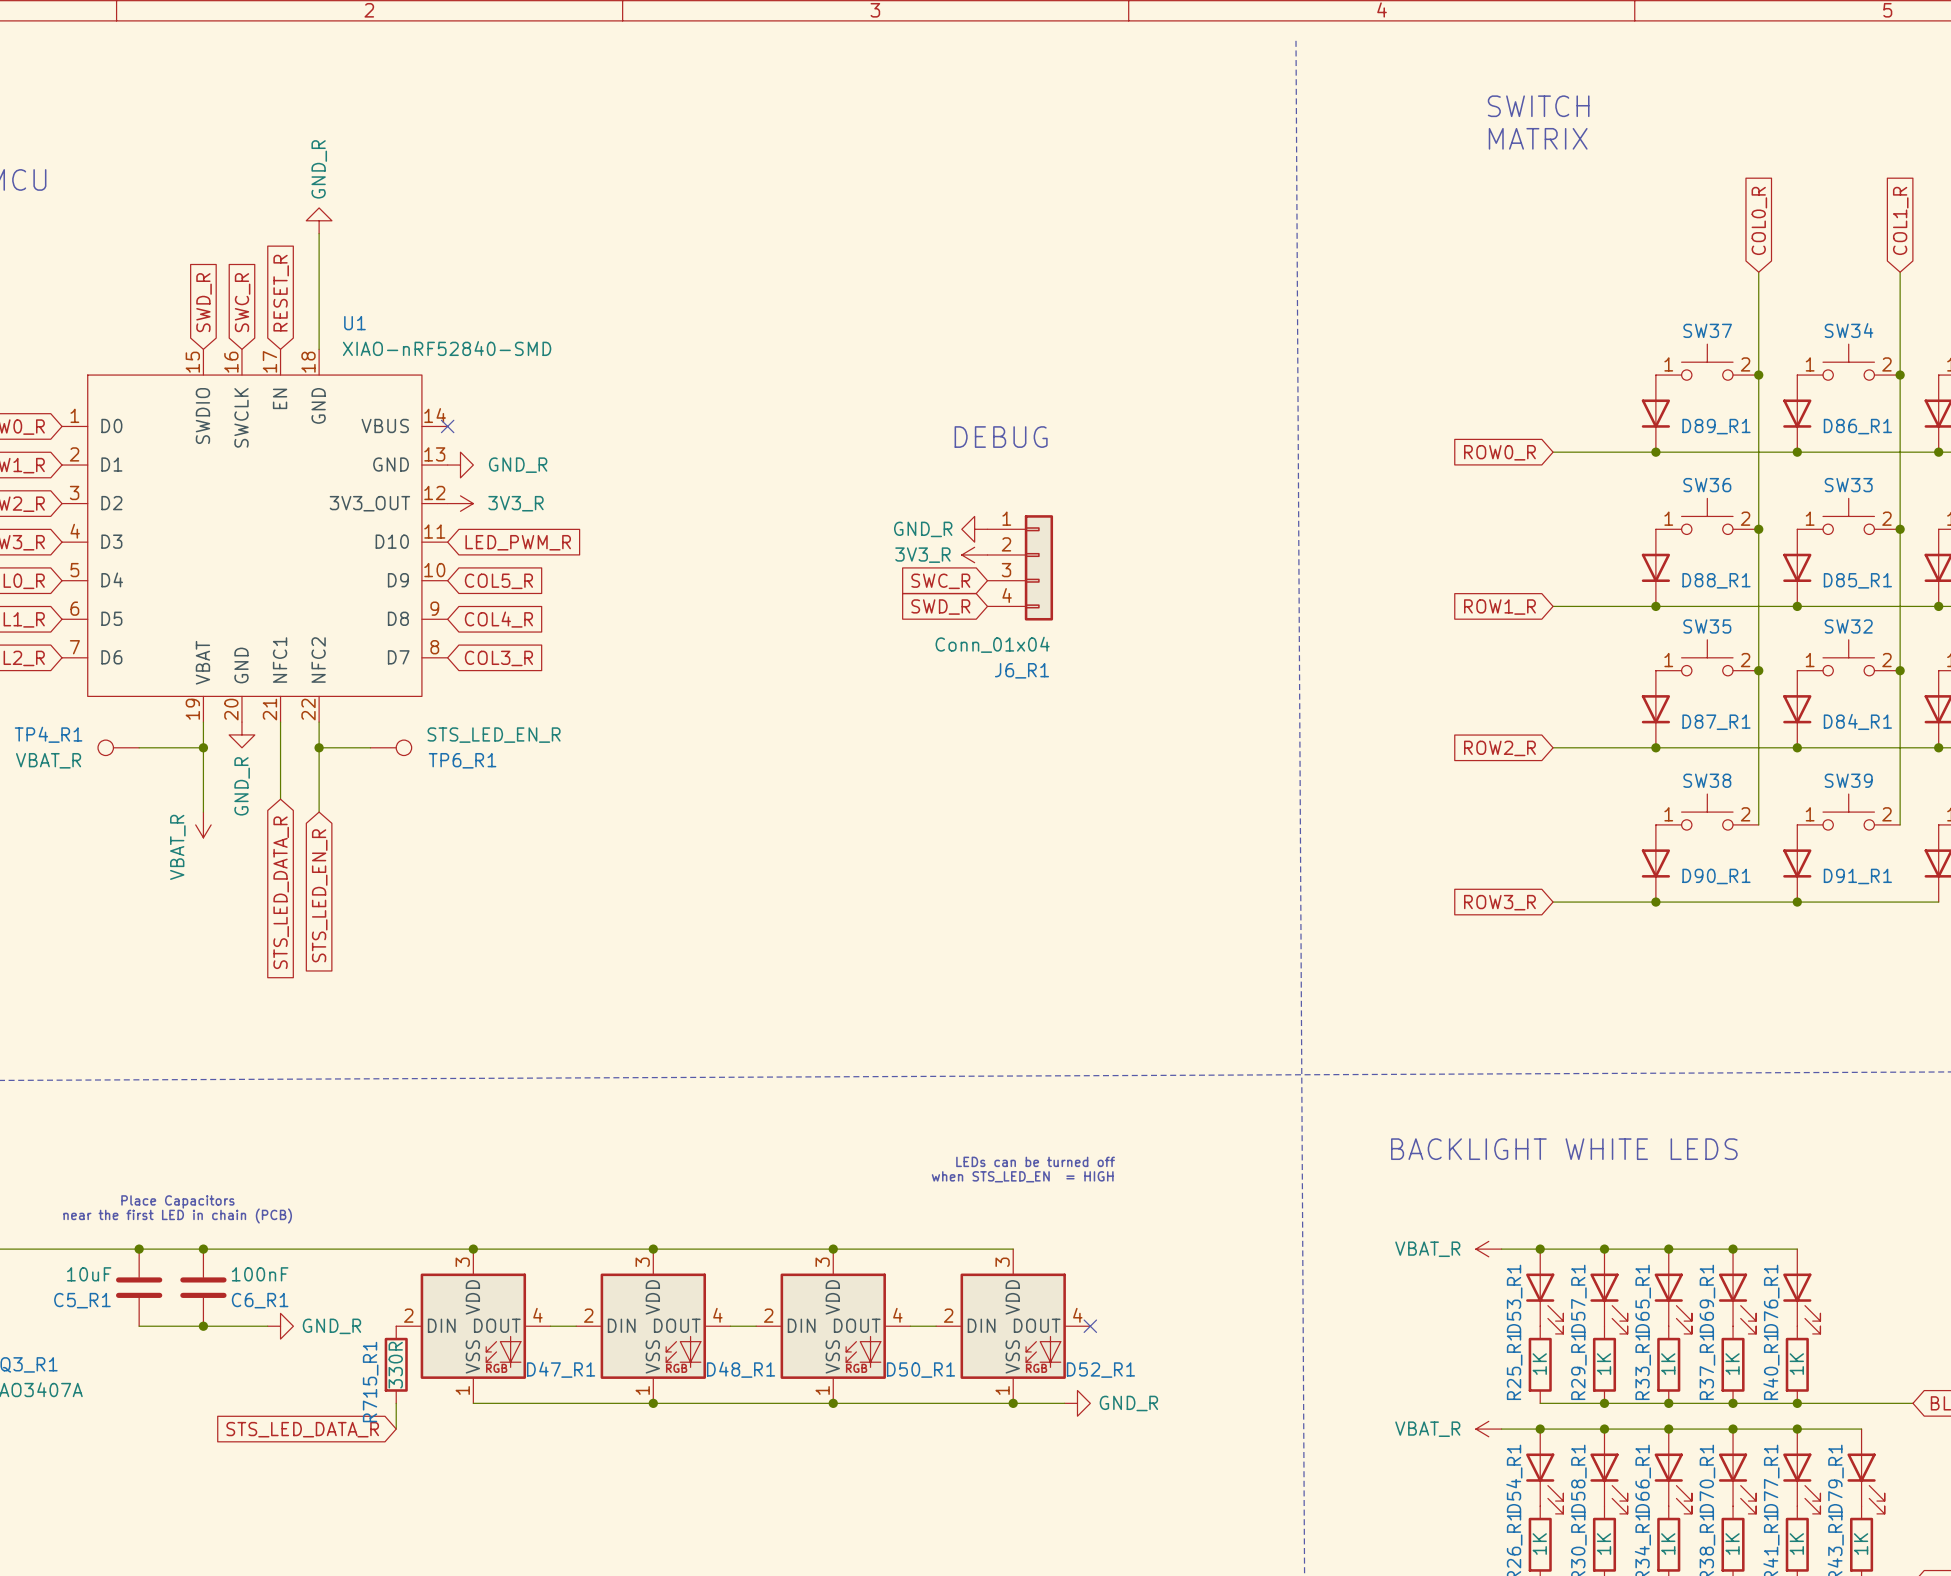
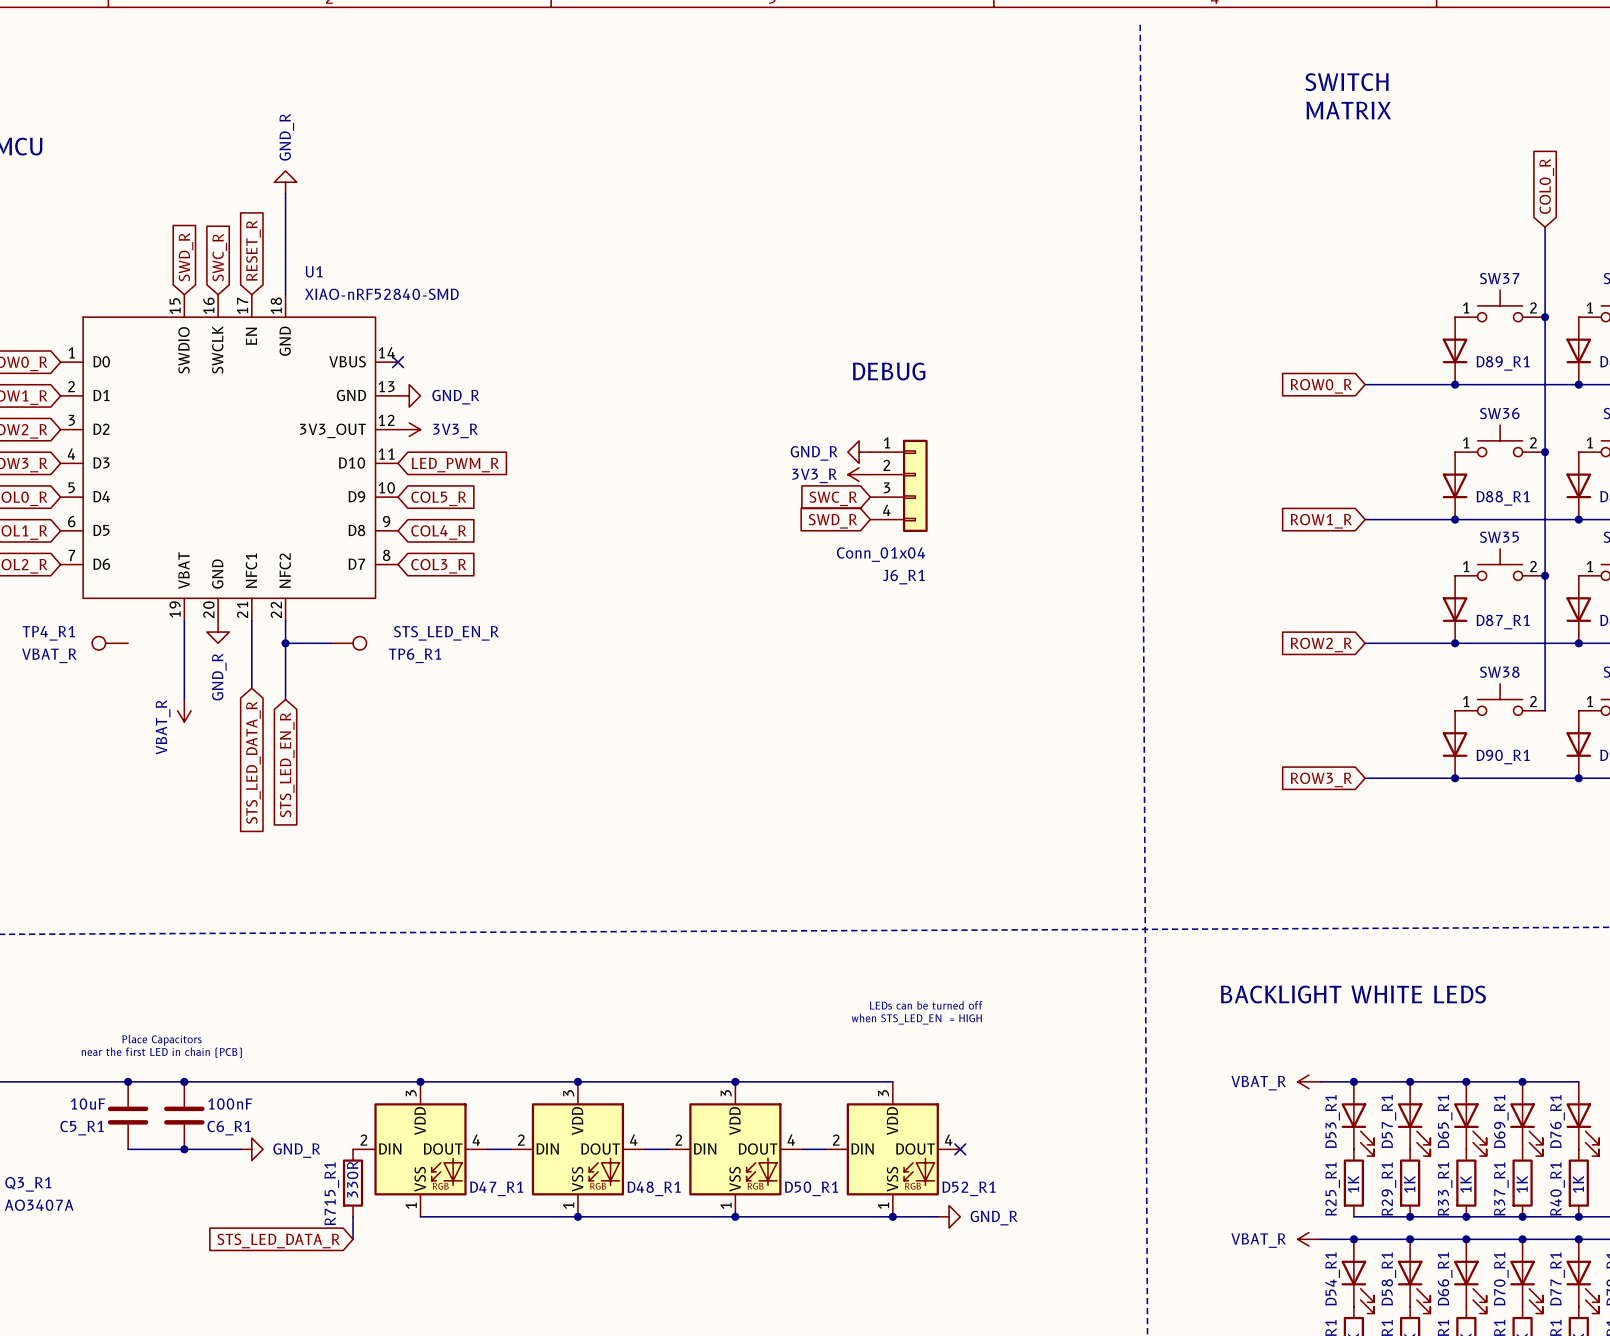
wire: (139, 747) (203, 747) -> none
junction: (203, 747) -> none

